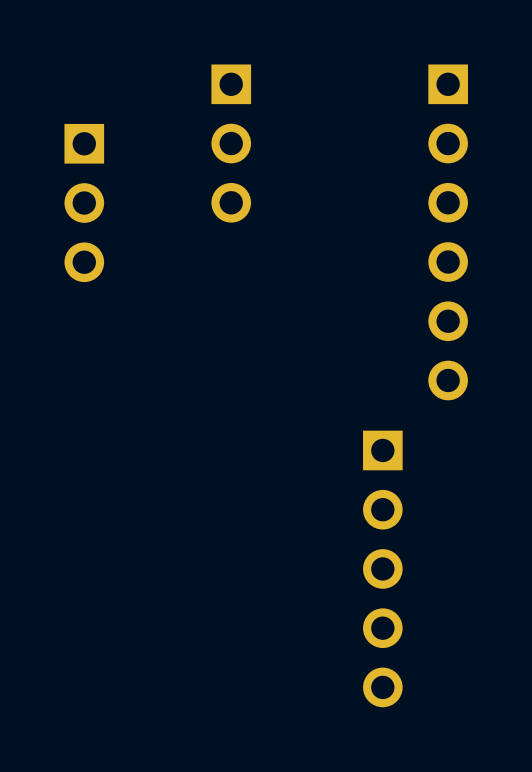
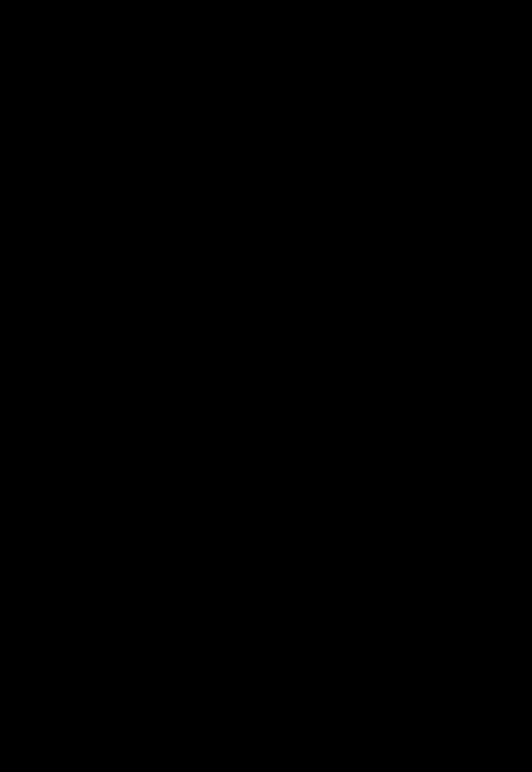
part: (231, 143) -> none
part: (84, 203) -> none
part: (448, 232) -> none
part: (382, 568) -> none

